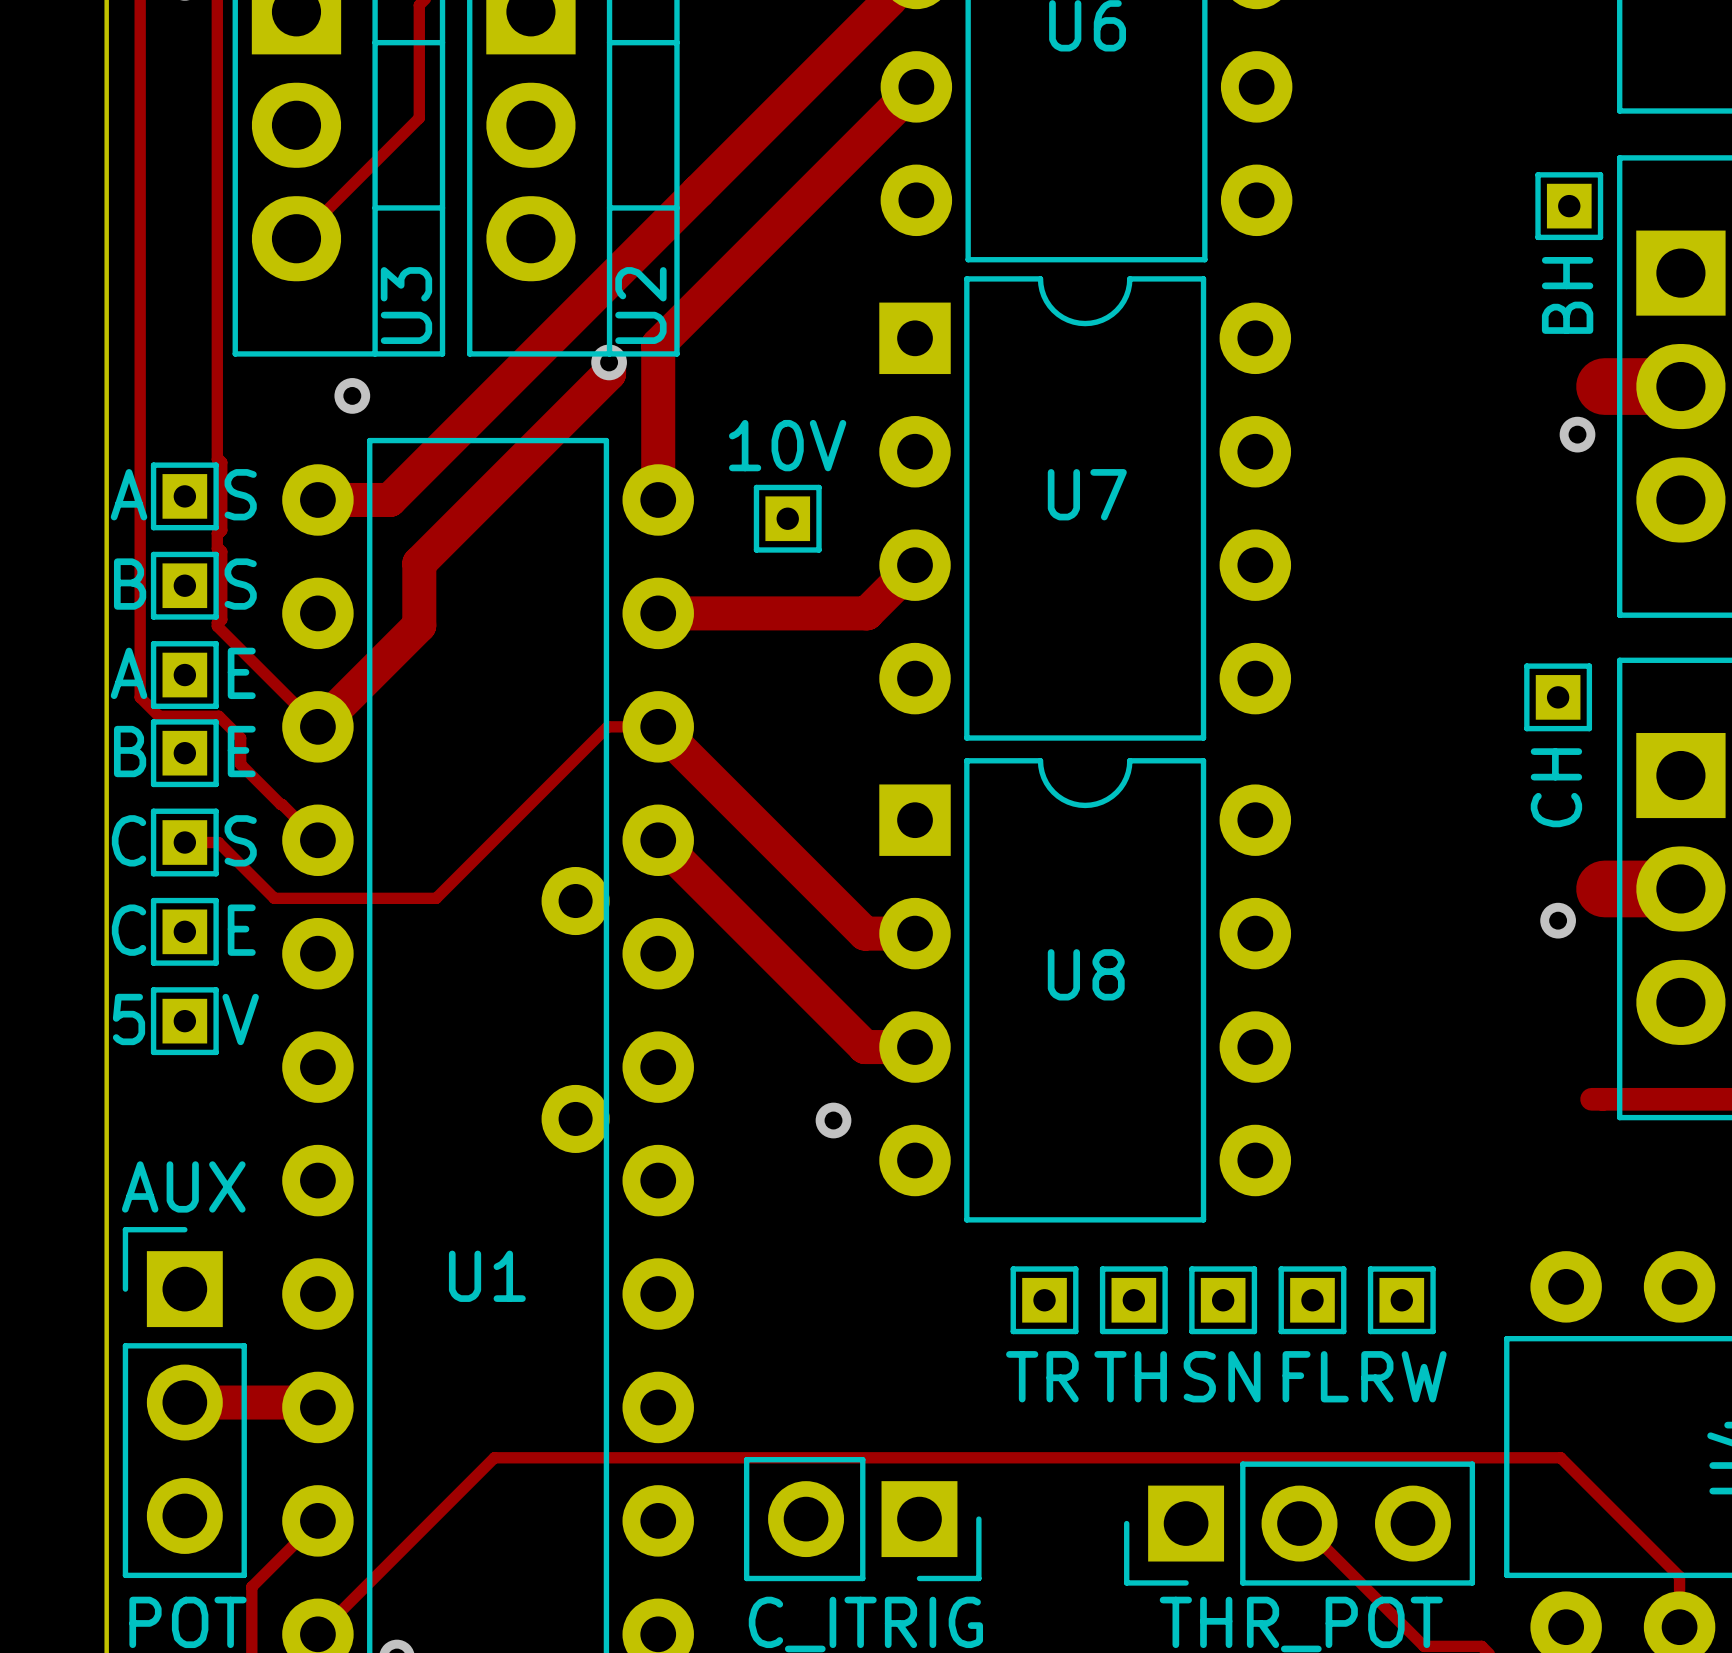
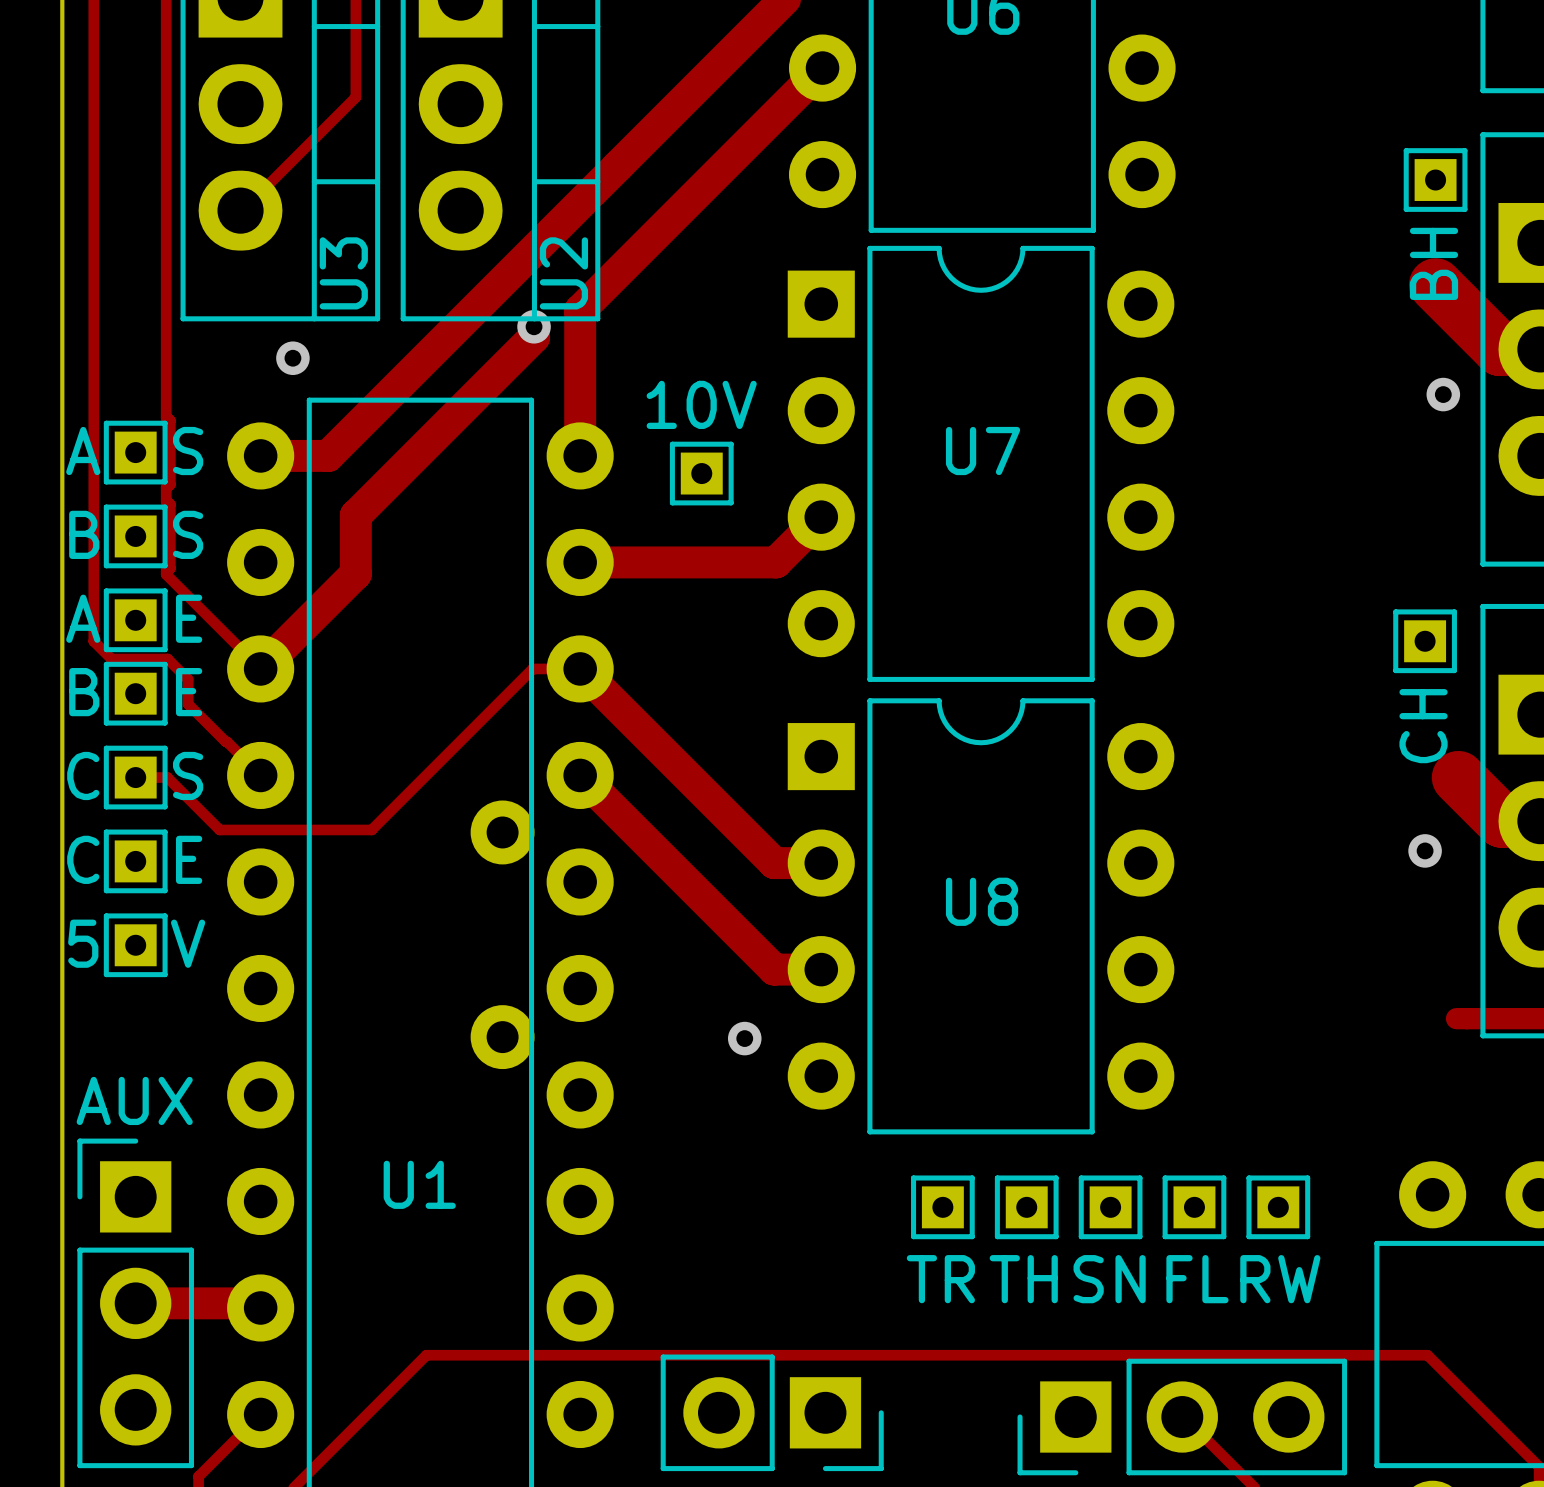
track: (1604, 386) (1638, 386) -> (1435, 284) (1500, 349)
track: (1604, 888) (1640, 888) -> (1458, 777) (1502, 821)

